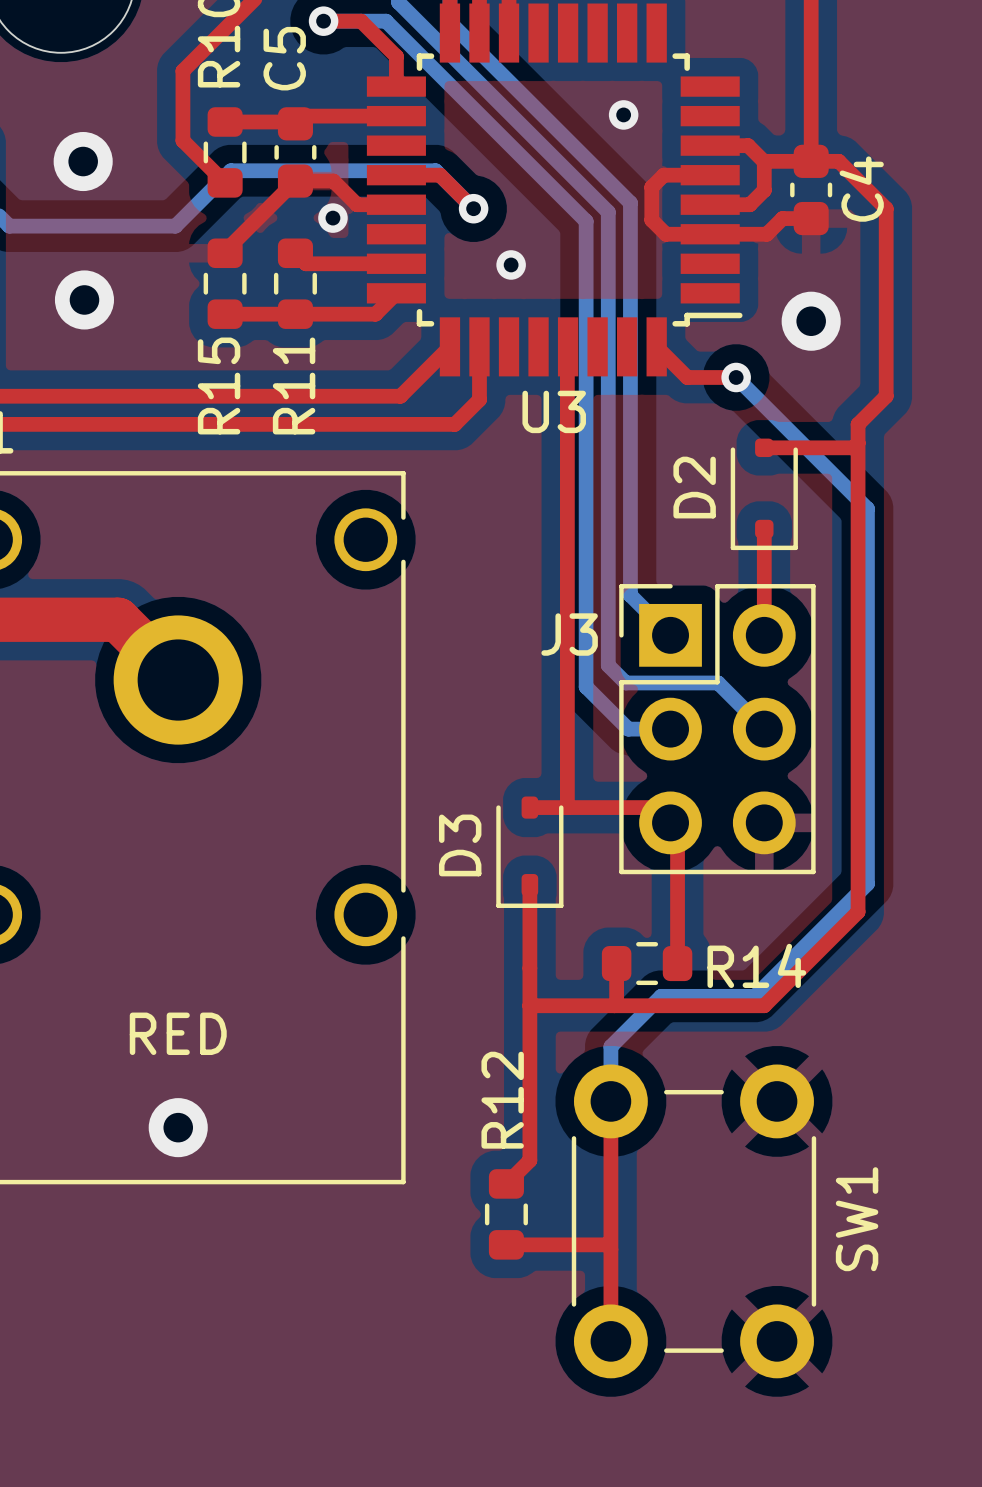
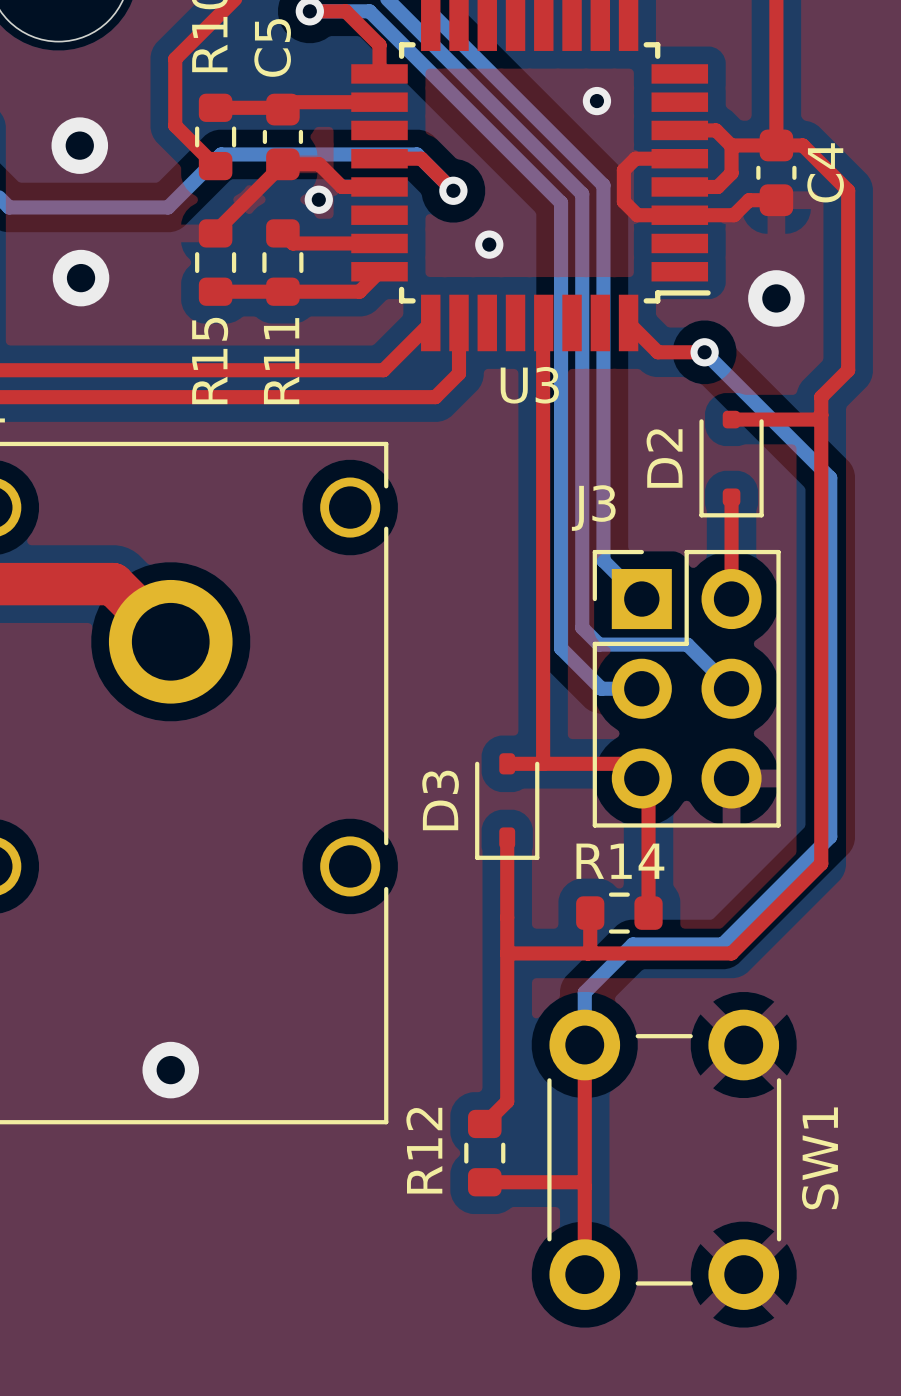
J3 name position: J3 (569, 634) -> J3 (593, 508)
R14 name position: R14 (756, 965) -> R14 (620, 861)
text: RED (178, 1033) -> none
R12 name position: R12 (502, 1100) -> R12 (424, 1150)

